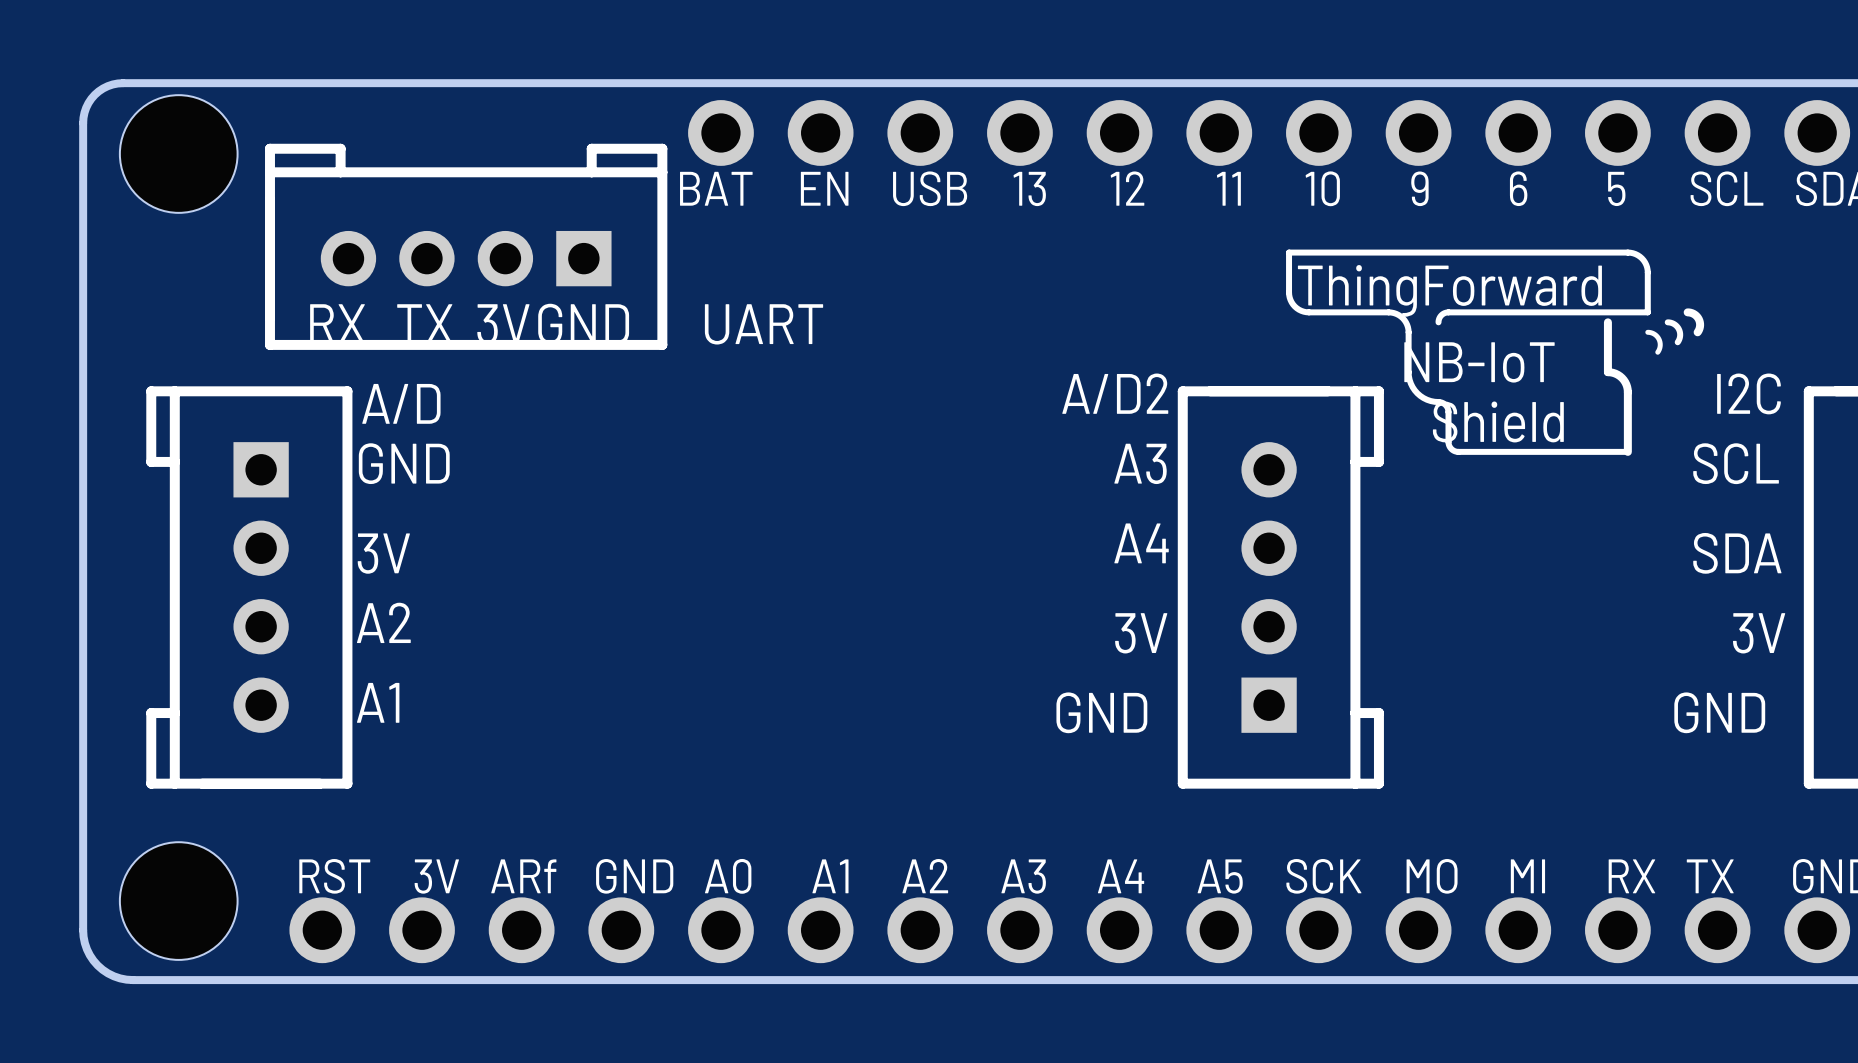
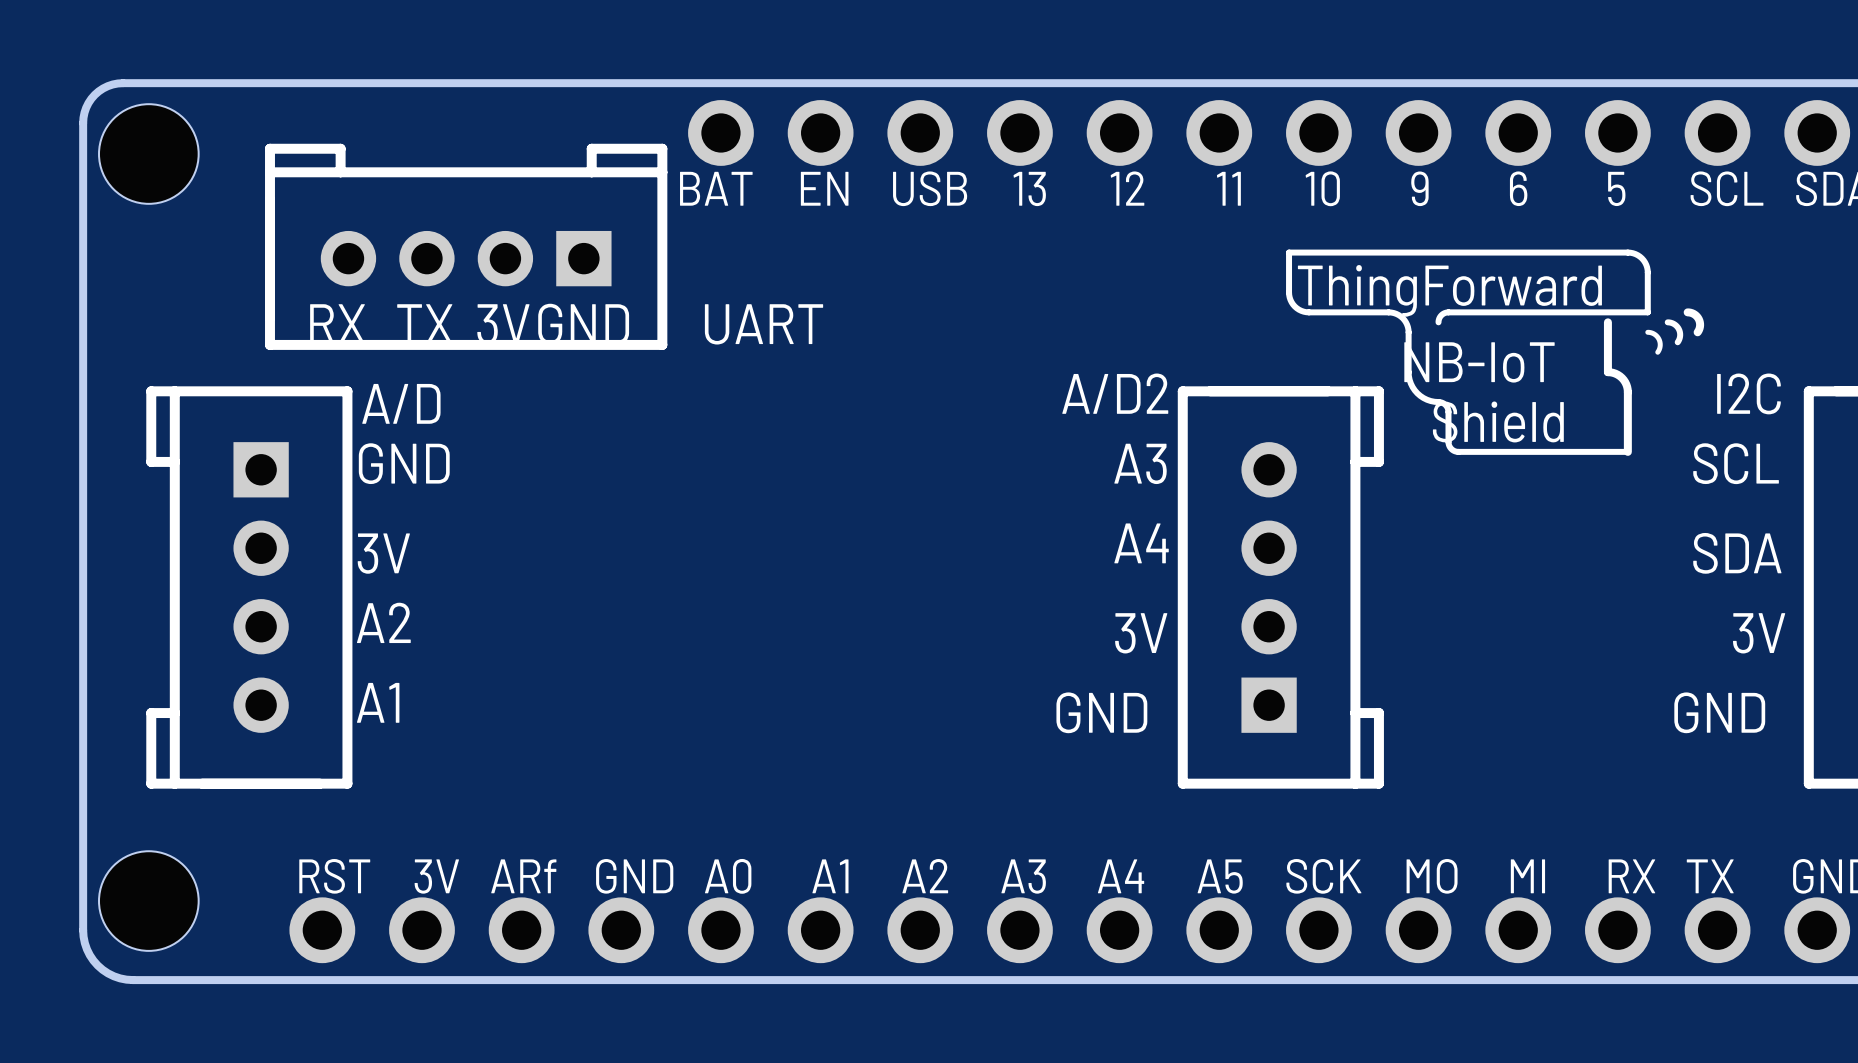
hole size: [119, 95, 238, 213] -> [99, 104, 199, 204]
hole size: [119, 842, 238, 960] -> [99, 851, 199, 951]

